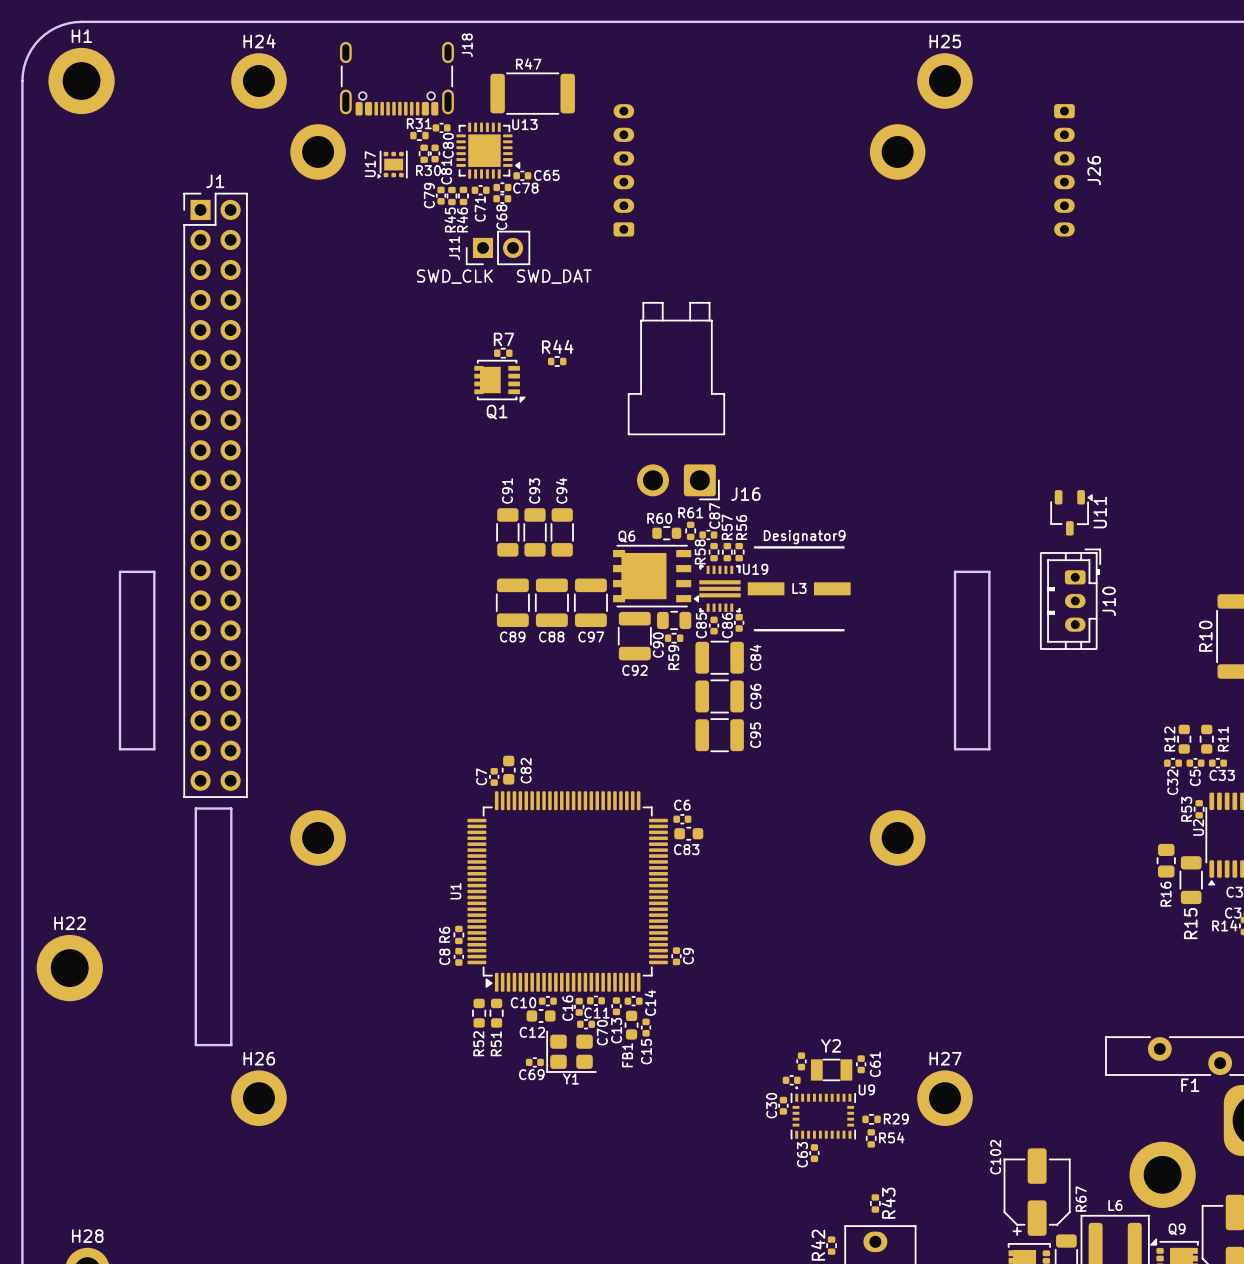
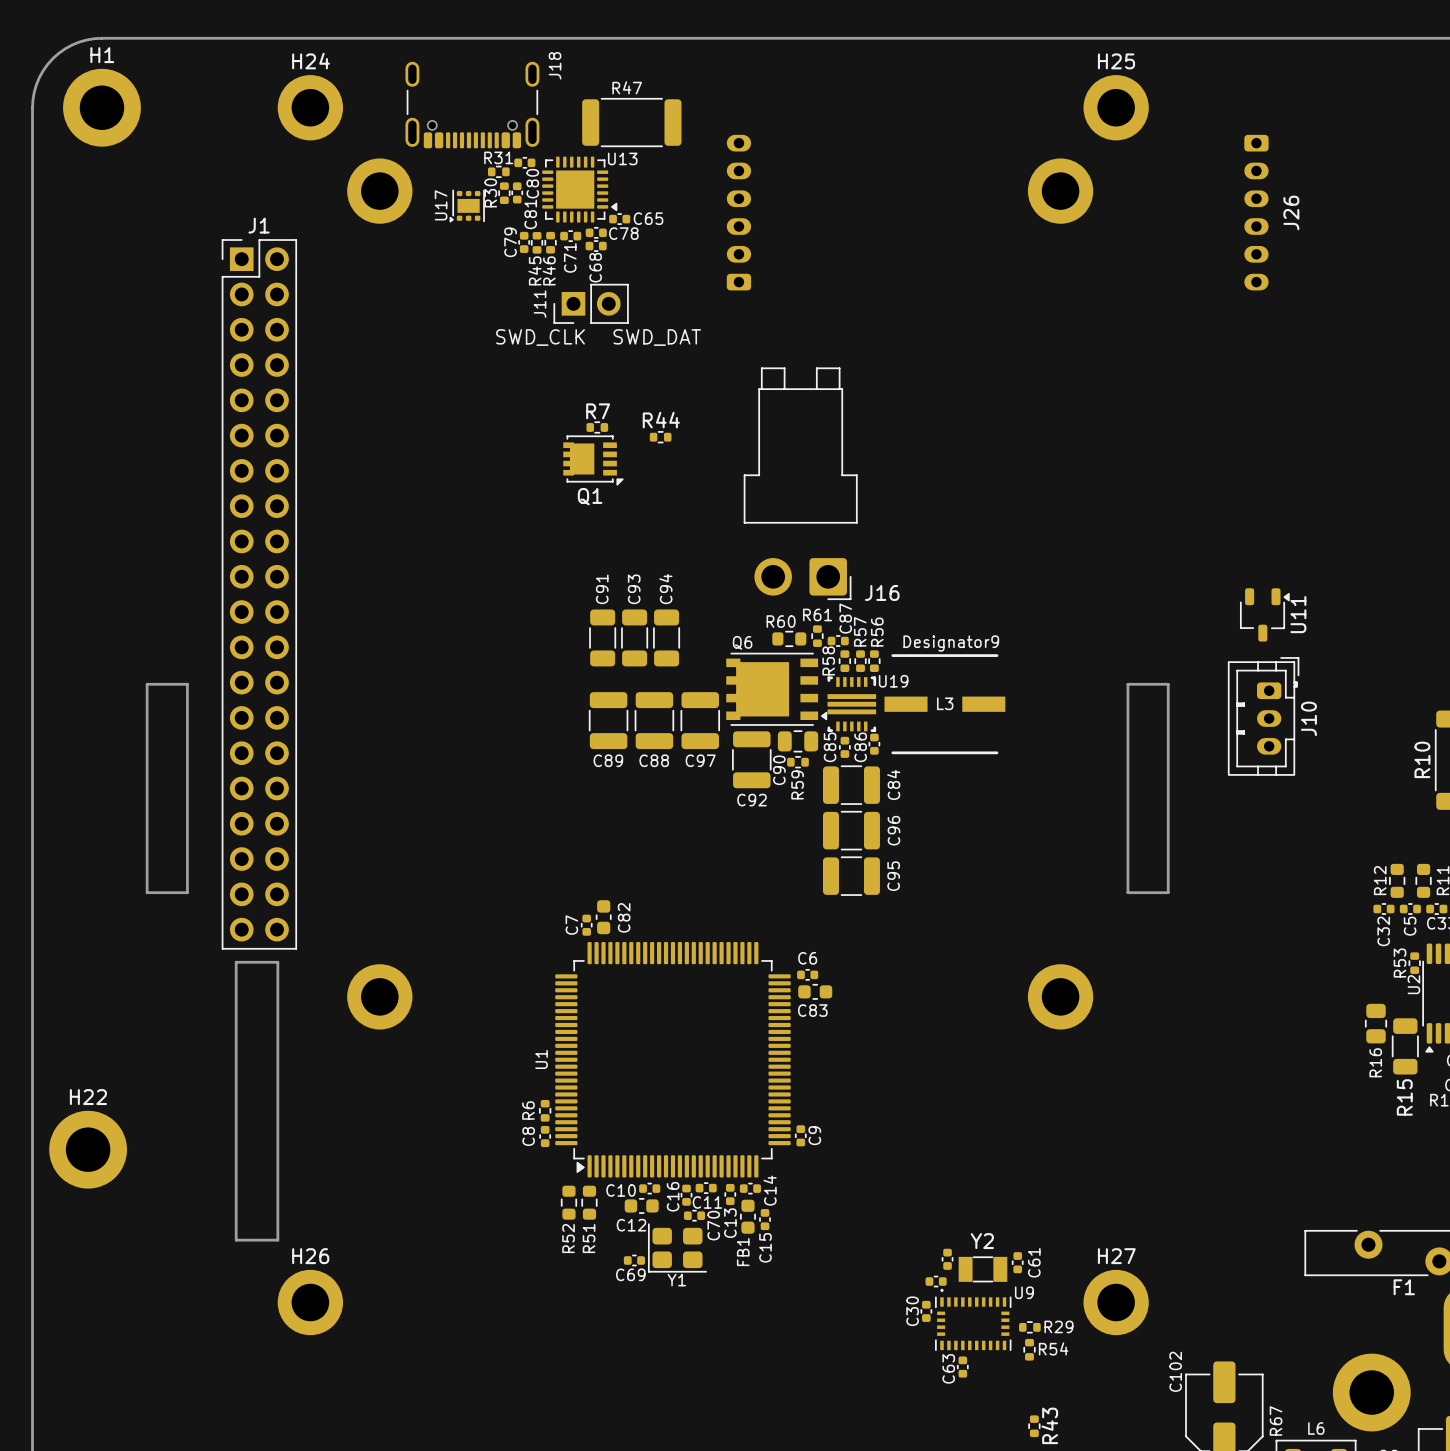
R30 name rotation: 0° (428, 170) -> 90° counterclockwise (490, 192)

